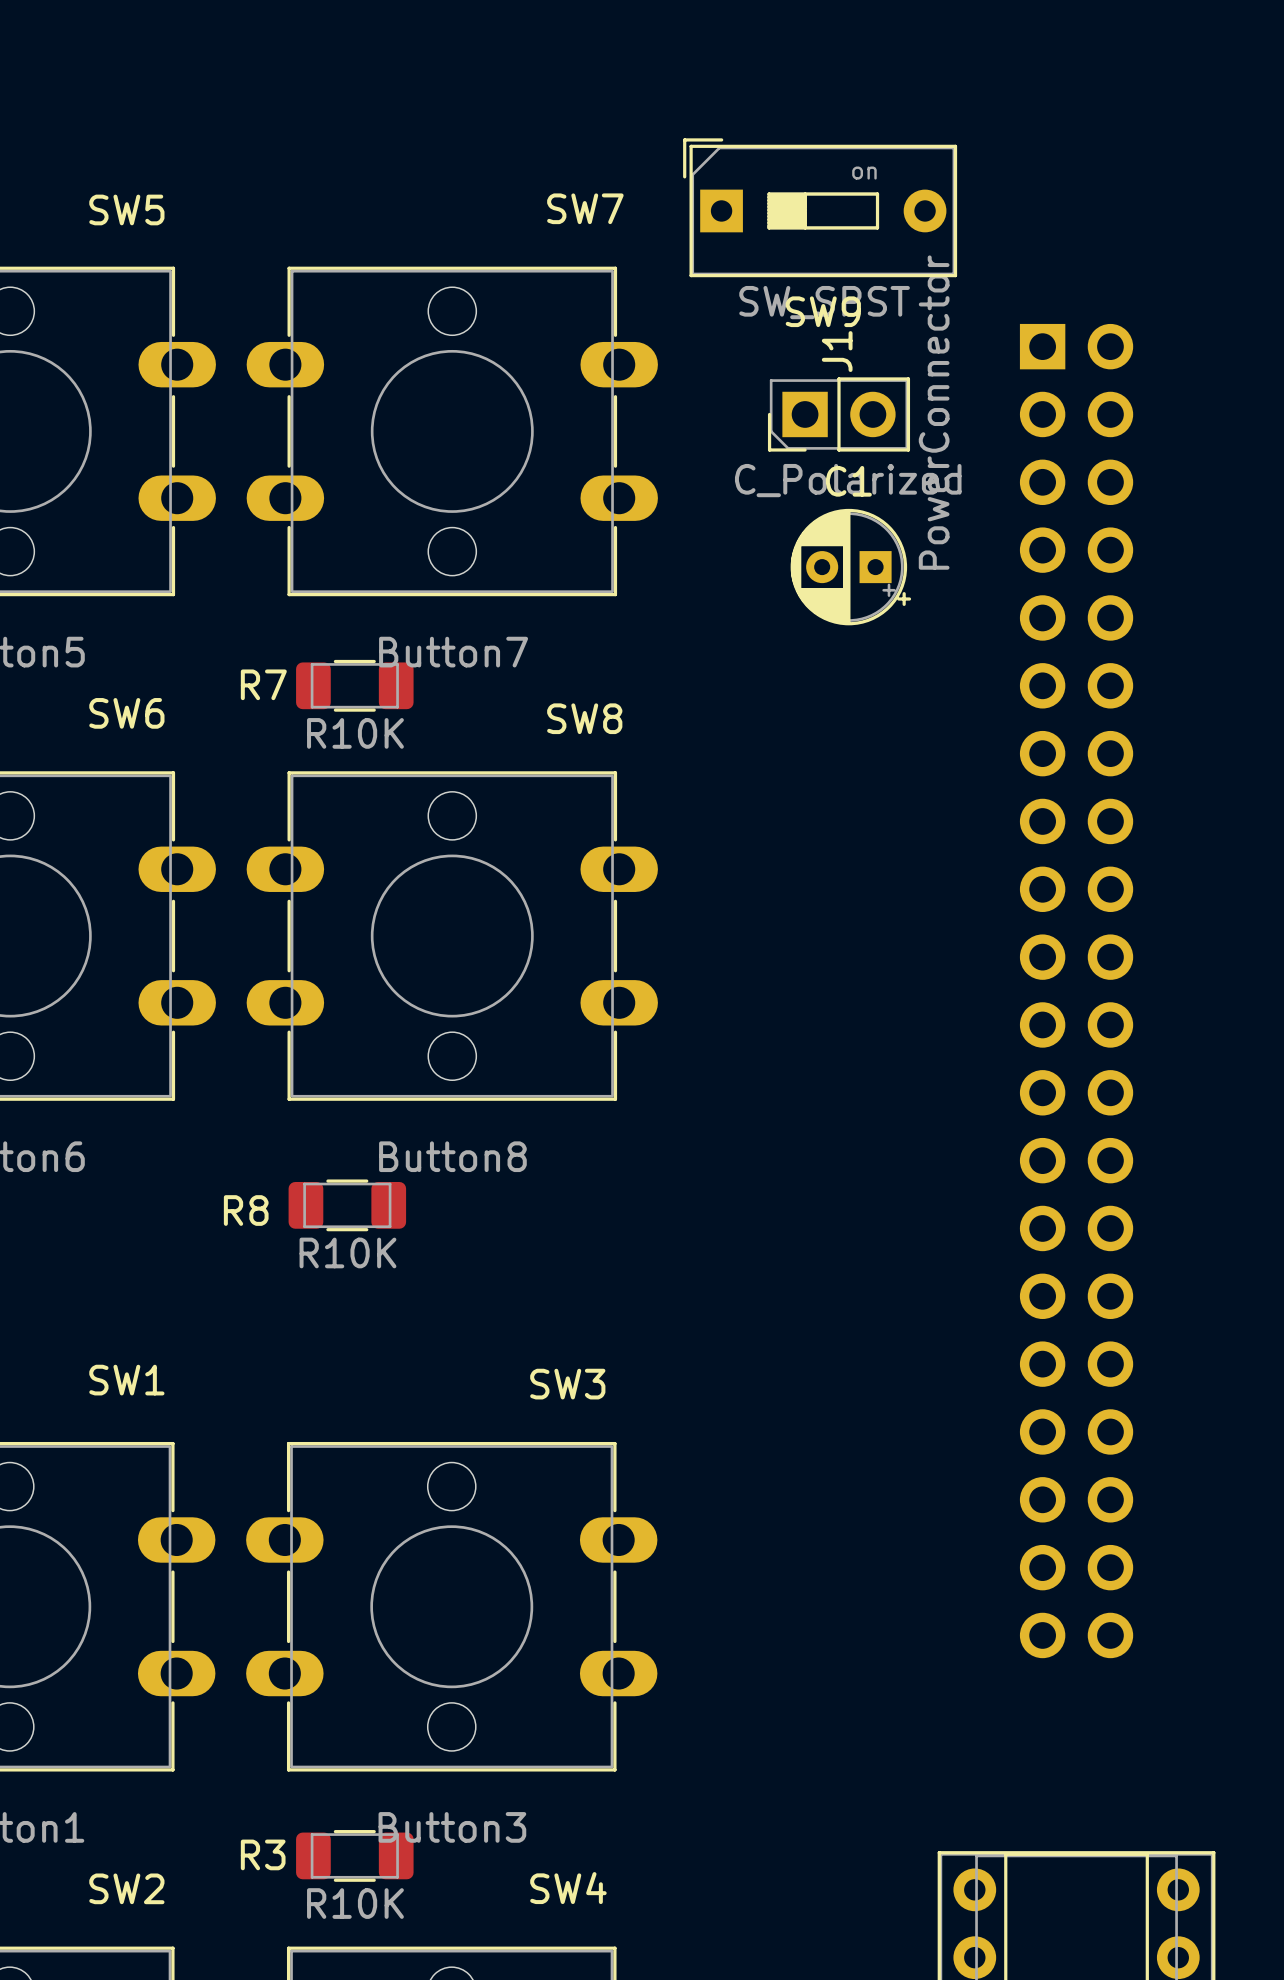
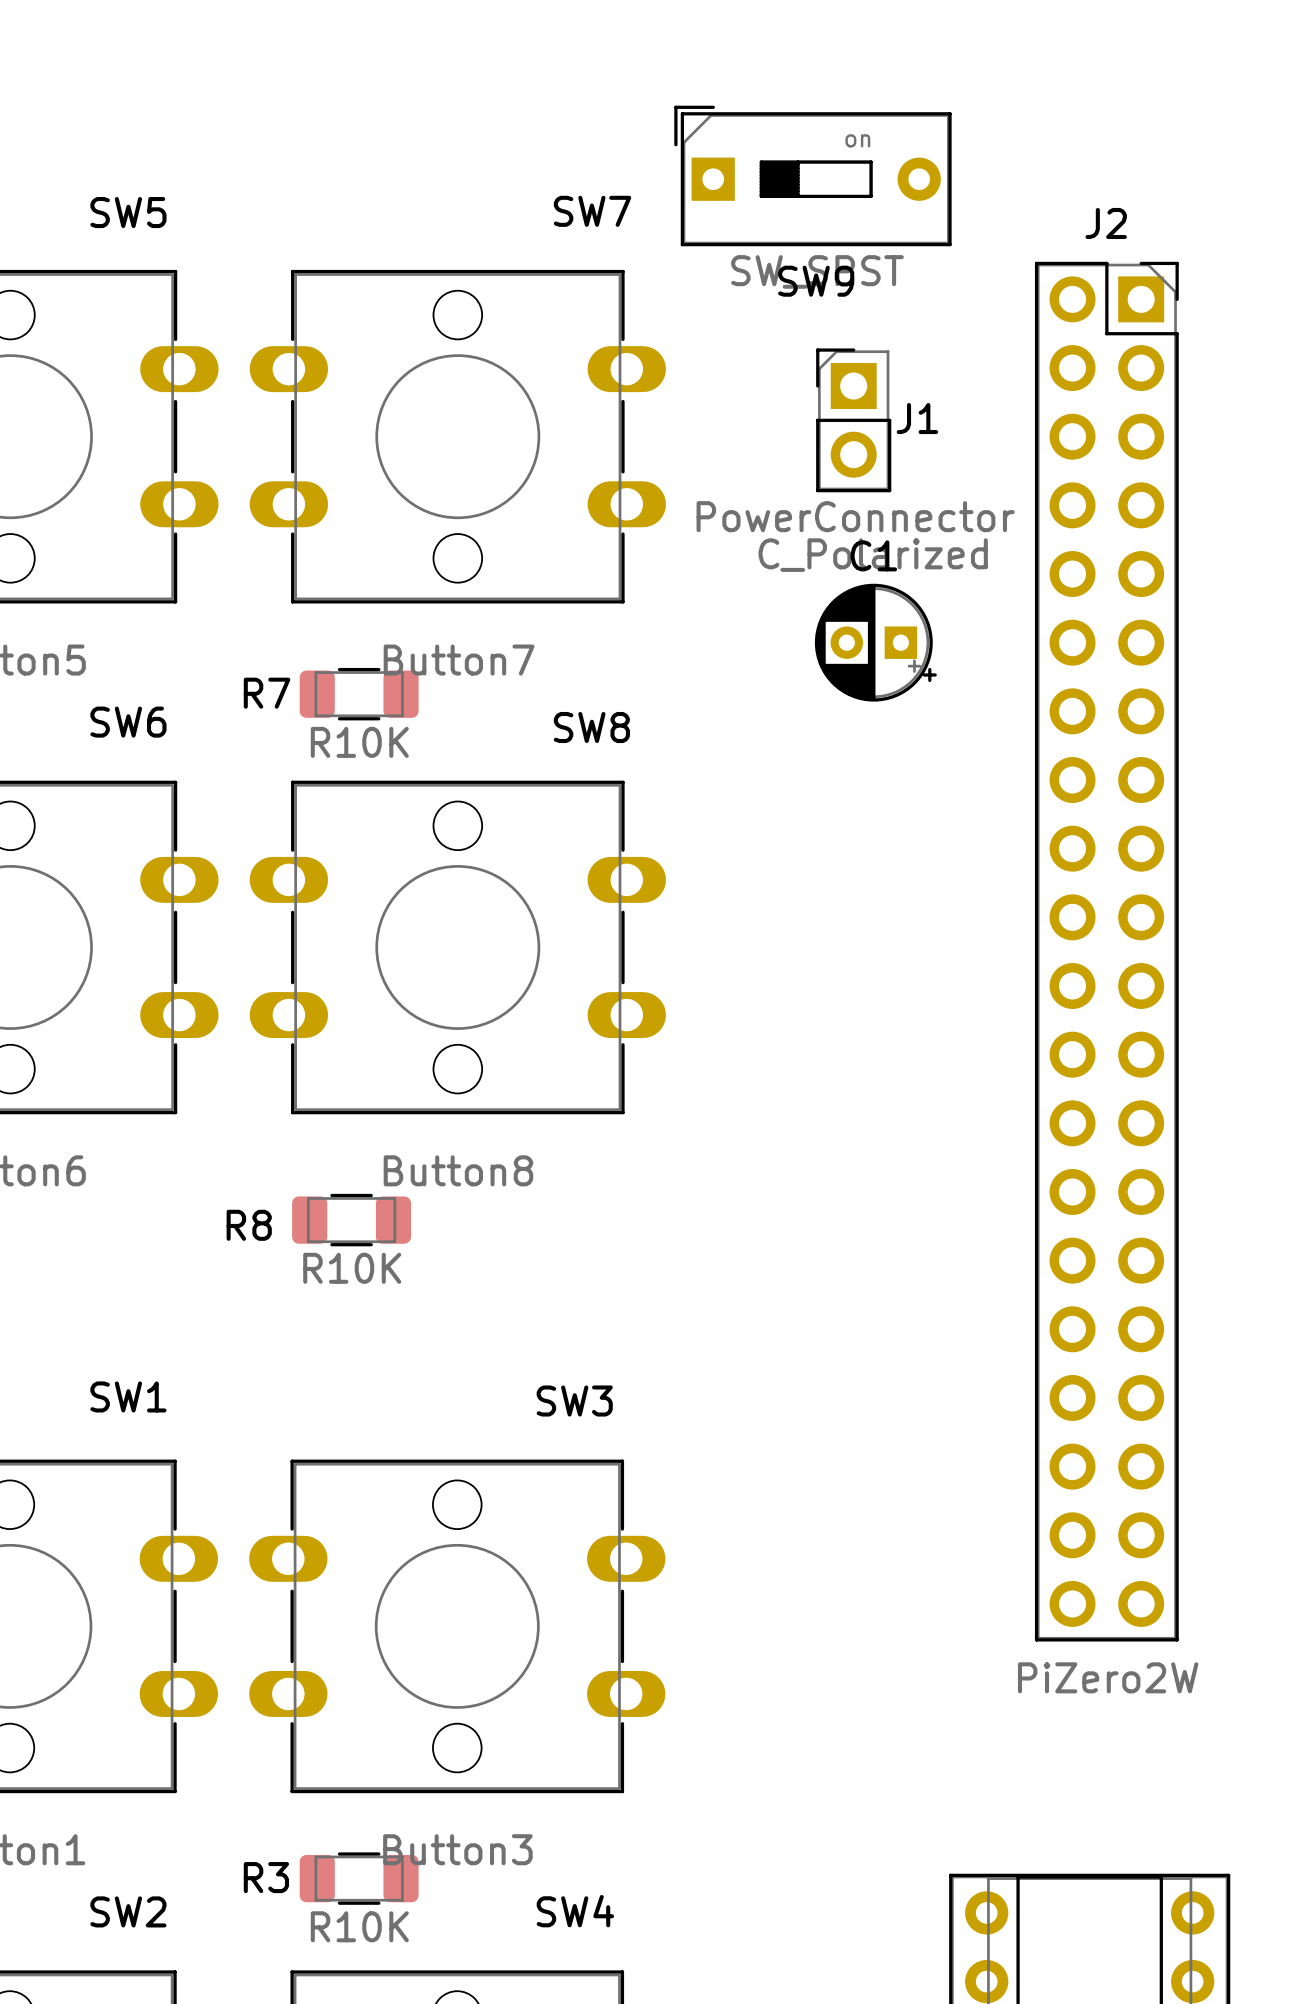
SW9 position: (820, 207) -> (812, 175)
J1 rotation: 0° (838, 414) -> 90° clockwise (853, 420)
C1 position: (850, 567) -> (875, 642)
J2 side: bottom (1076, 991) -> top (1106, 951)

